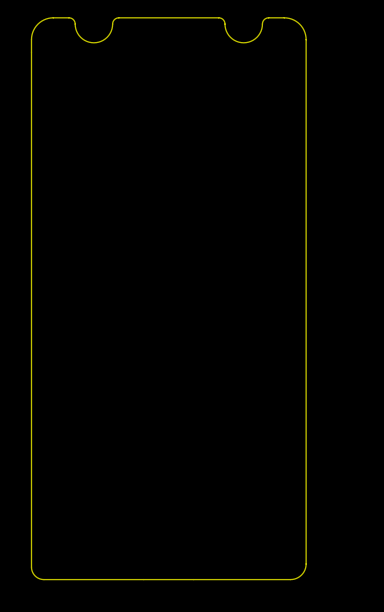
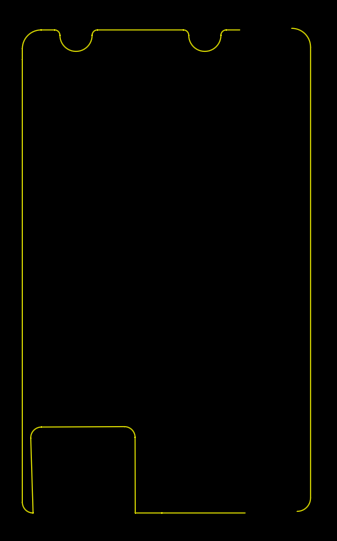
board edge: (284, 17) (293, 19) (299, 24) (304, 32) (306, 39) (306, 563) (301, 575) (290, 579) -> (291, 28) (305, 33) (310, 47) (310, 497) (306, 507) (297, 511)
board edge: (162, 579) (43, 579) -> (135, 512) (135, 436) (131, 429) (124, 426) (41, 427) (33, 430) (30, 438) (33, 512)

